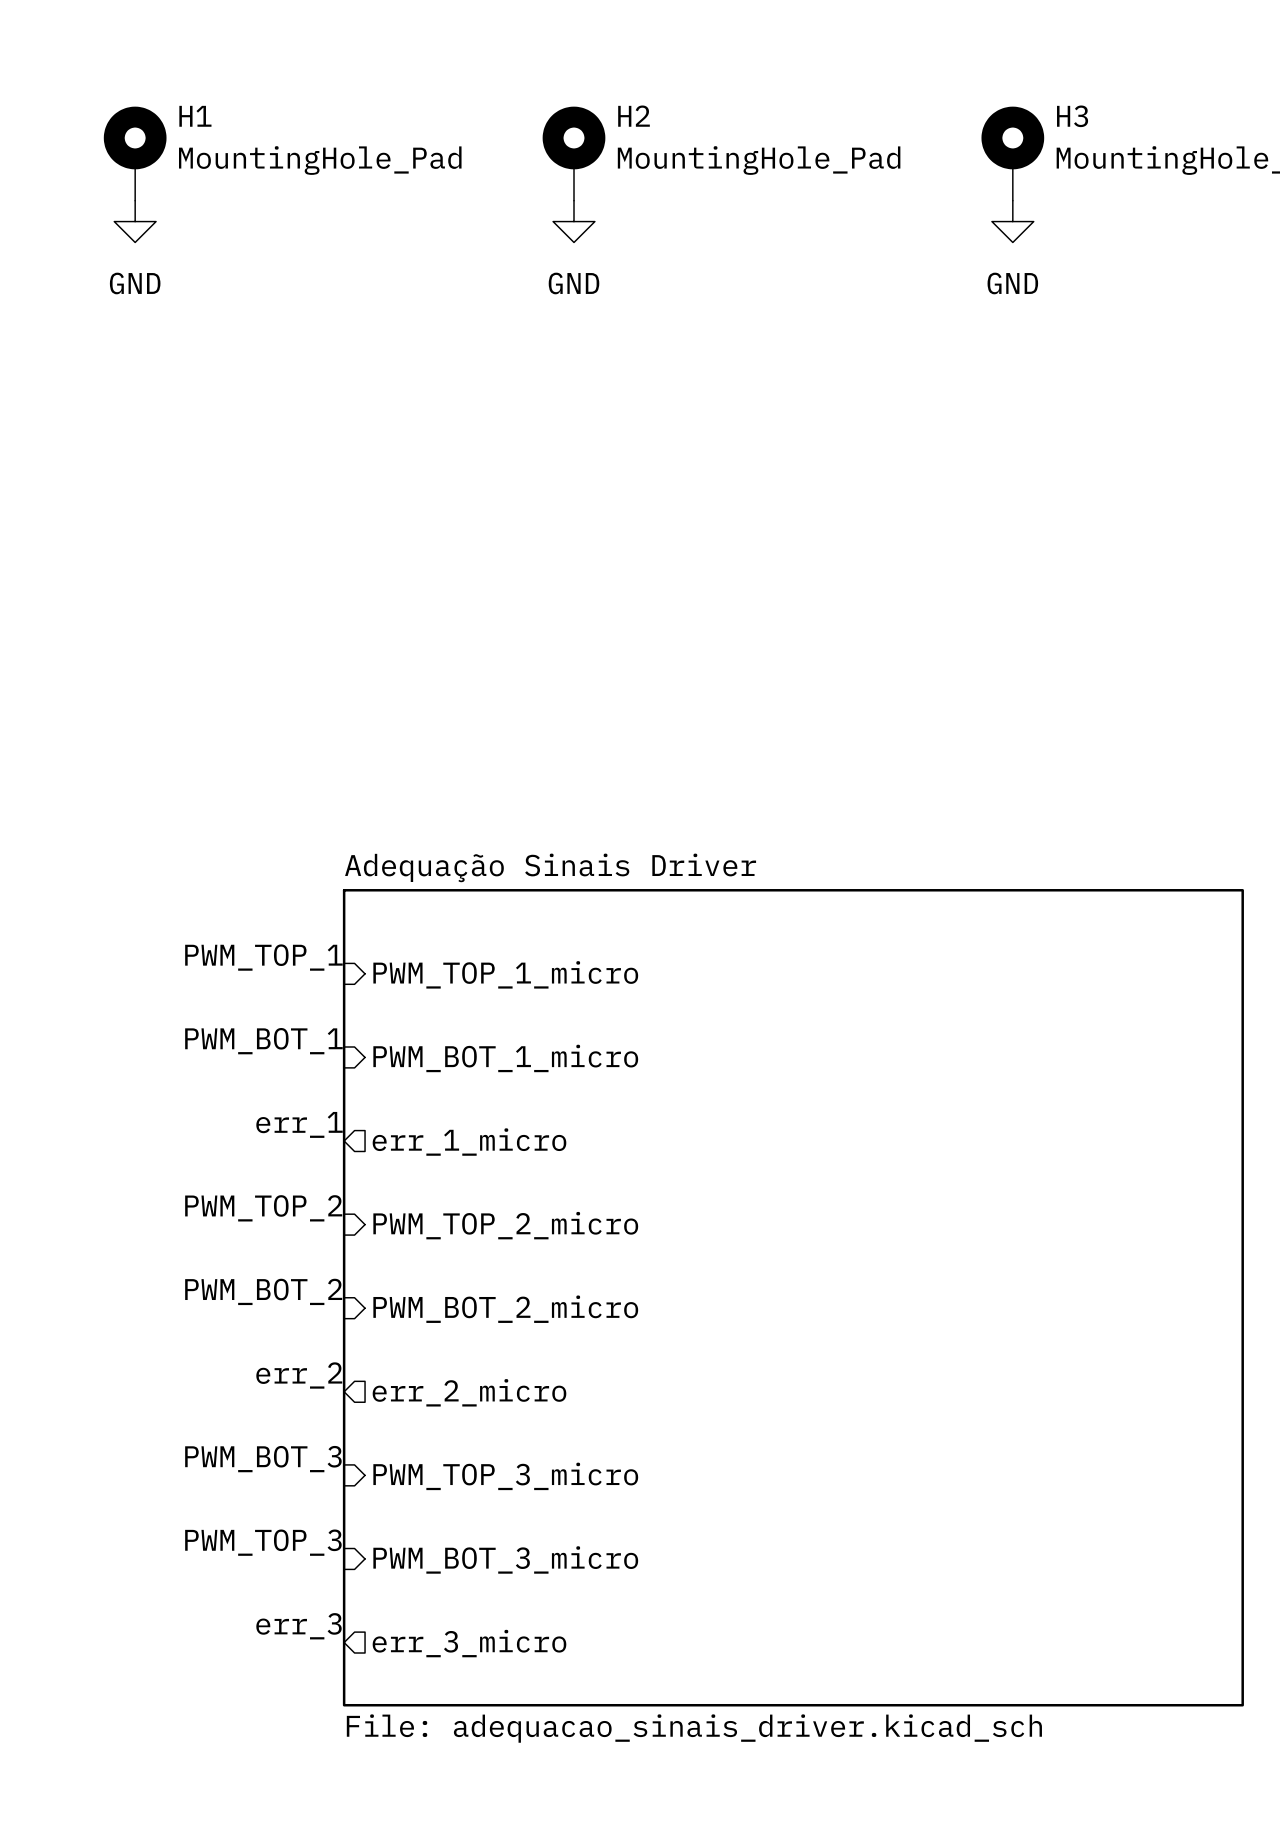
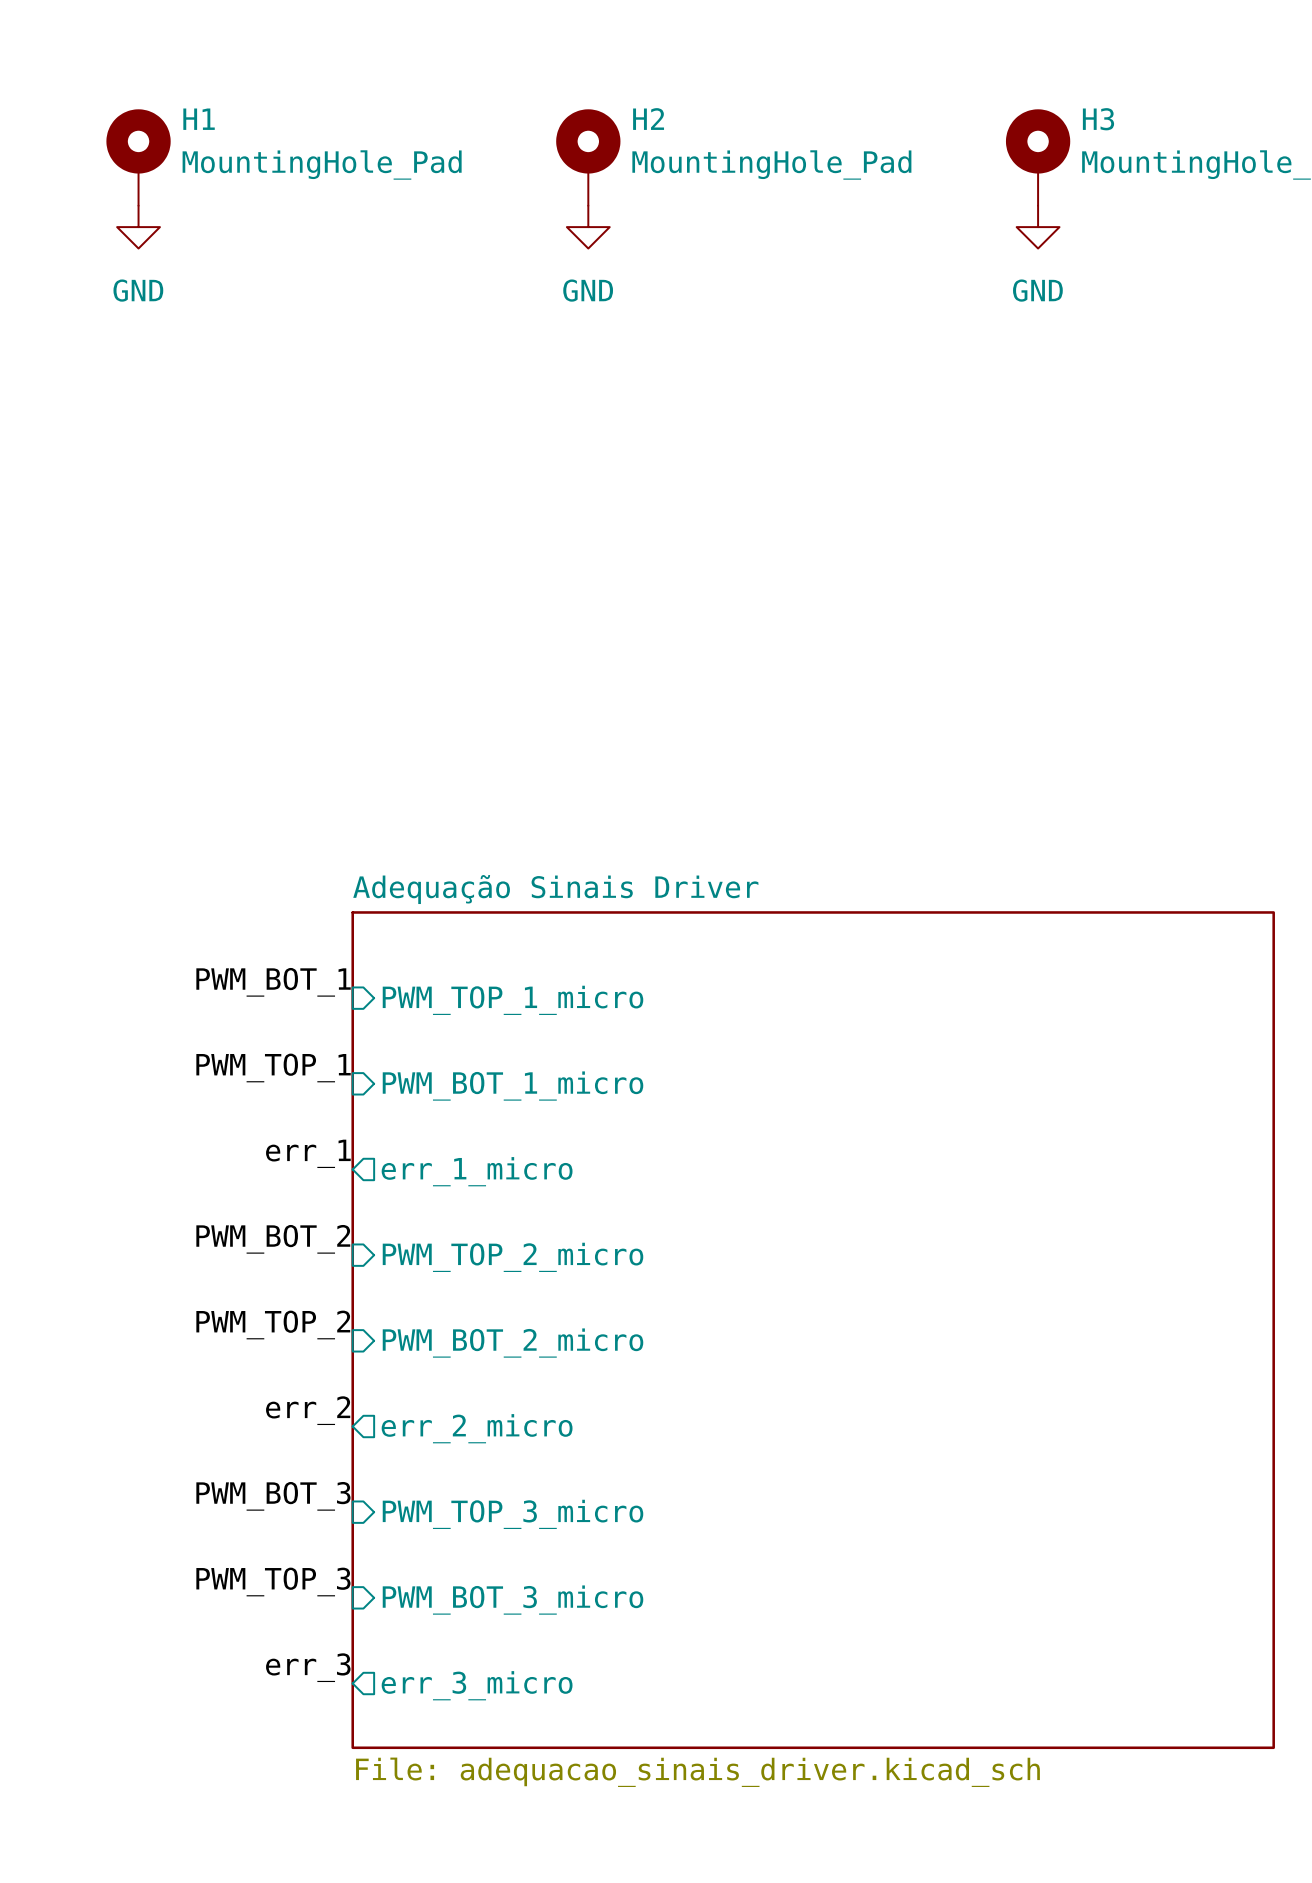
label: PWM_TOP_1 (263, 957) -> PWM_BOT_1 (273, 982)
label: PWM_BOT_1 (263, 1041) -> PWM_TOP_1 (273, 1067)
label: PWM_TOP_2 (263, 1208) -> PWM_BOT_2 (273, 1239)
label: PWM_BOT_2 (263, 1291) -> PWM_TOP_2 (273, 1324)

